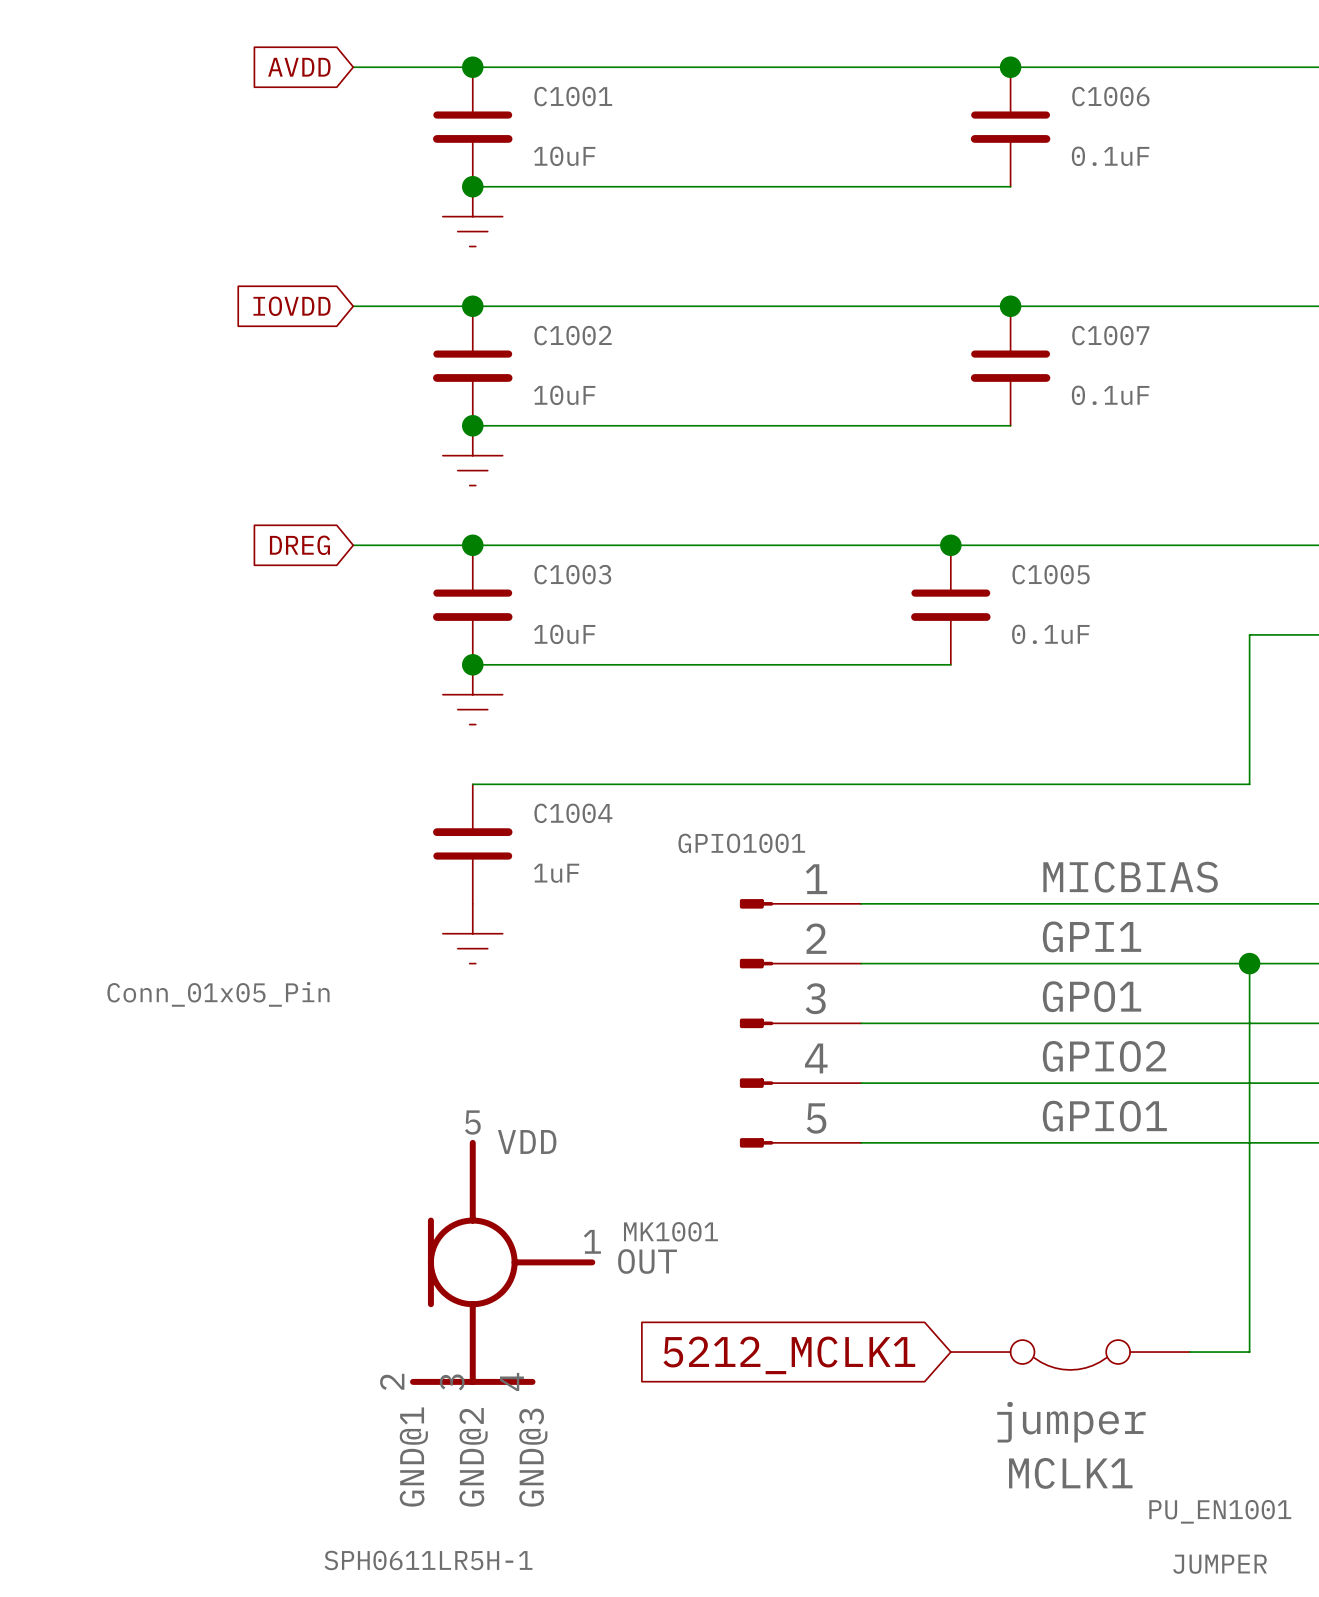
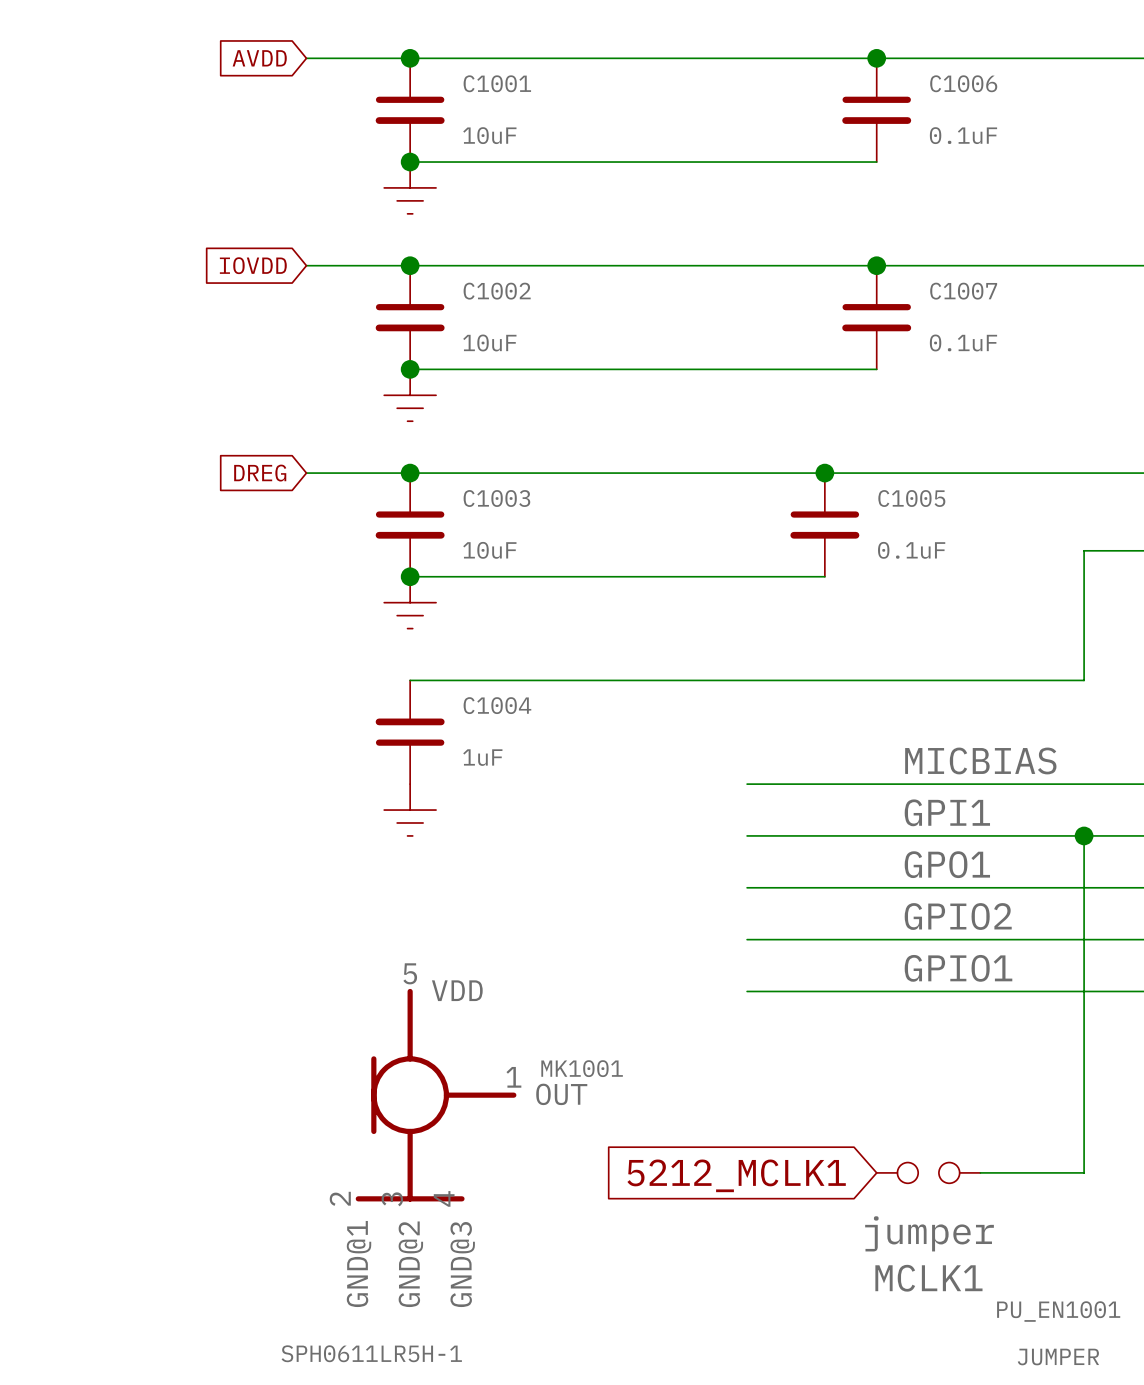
GPIO1001: Conn_01x05_Pin (800, 1023) -> none
MCLK1 symbol: [950, 1340, 1190, 1370] -> [876, 1162, 981, 1184]
global label position: 5212_MCLK1 (789, 1355) -> 5212_MCLK1 (736, 1175)

